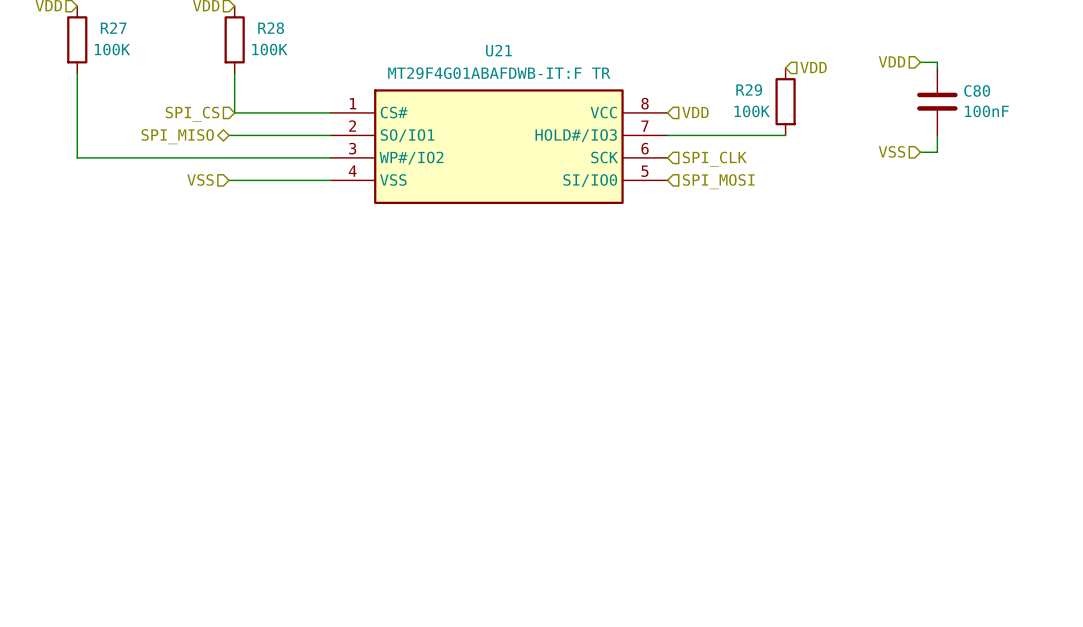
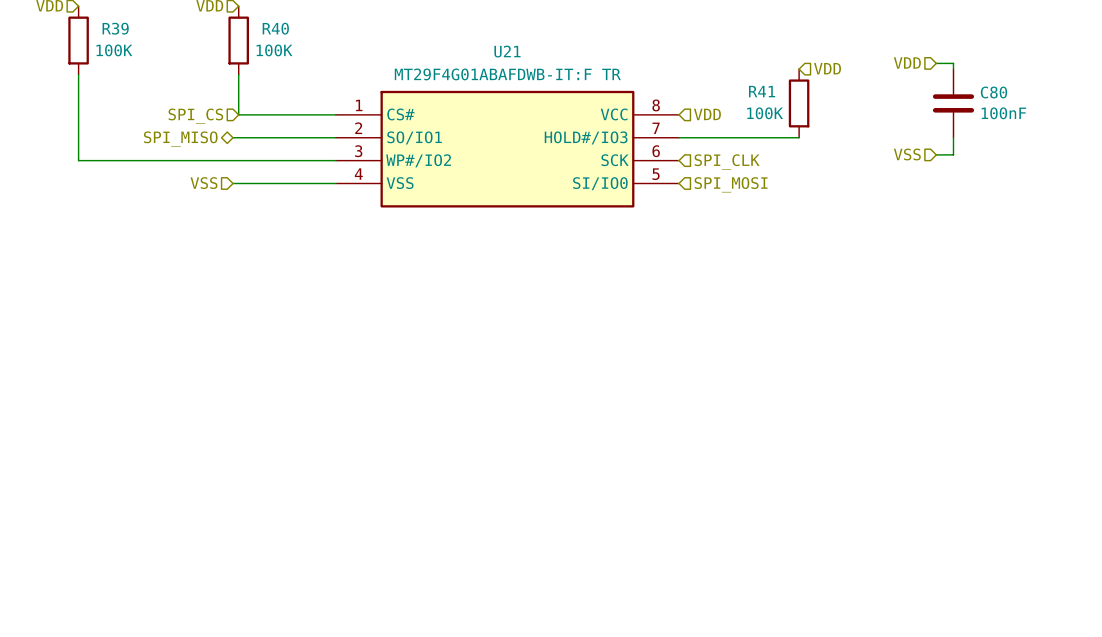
R27 name: R27 (113, 28) -> R39 (115, 28)
R28 name: R28 (271, 28) -> R40 (275, 28)
R29 name: R29 (749, 90) -> R41 (762, 91)

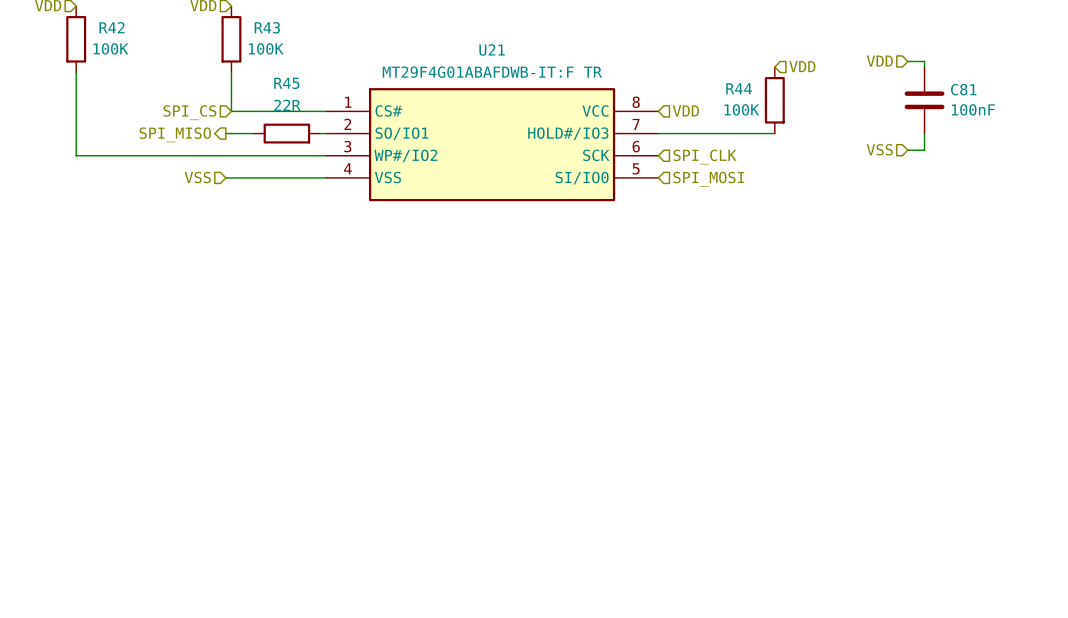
R39 name: R39 (115, 28) -> R42 (112, 27)
R40 name: R40 (275, 28) -> R43 (267, 27)
R41 name: R41 (762, 91) -> R44 (739, 88)
C80 name: C80 (993, 92) -> C81 (963, 89)
wire: (261, 137) (330, 137) -> none
R45: none -> 22R (286, 133)
hierarchical label shape: bidirectional (180, 139) -> output (175, 134)

